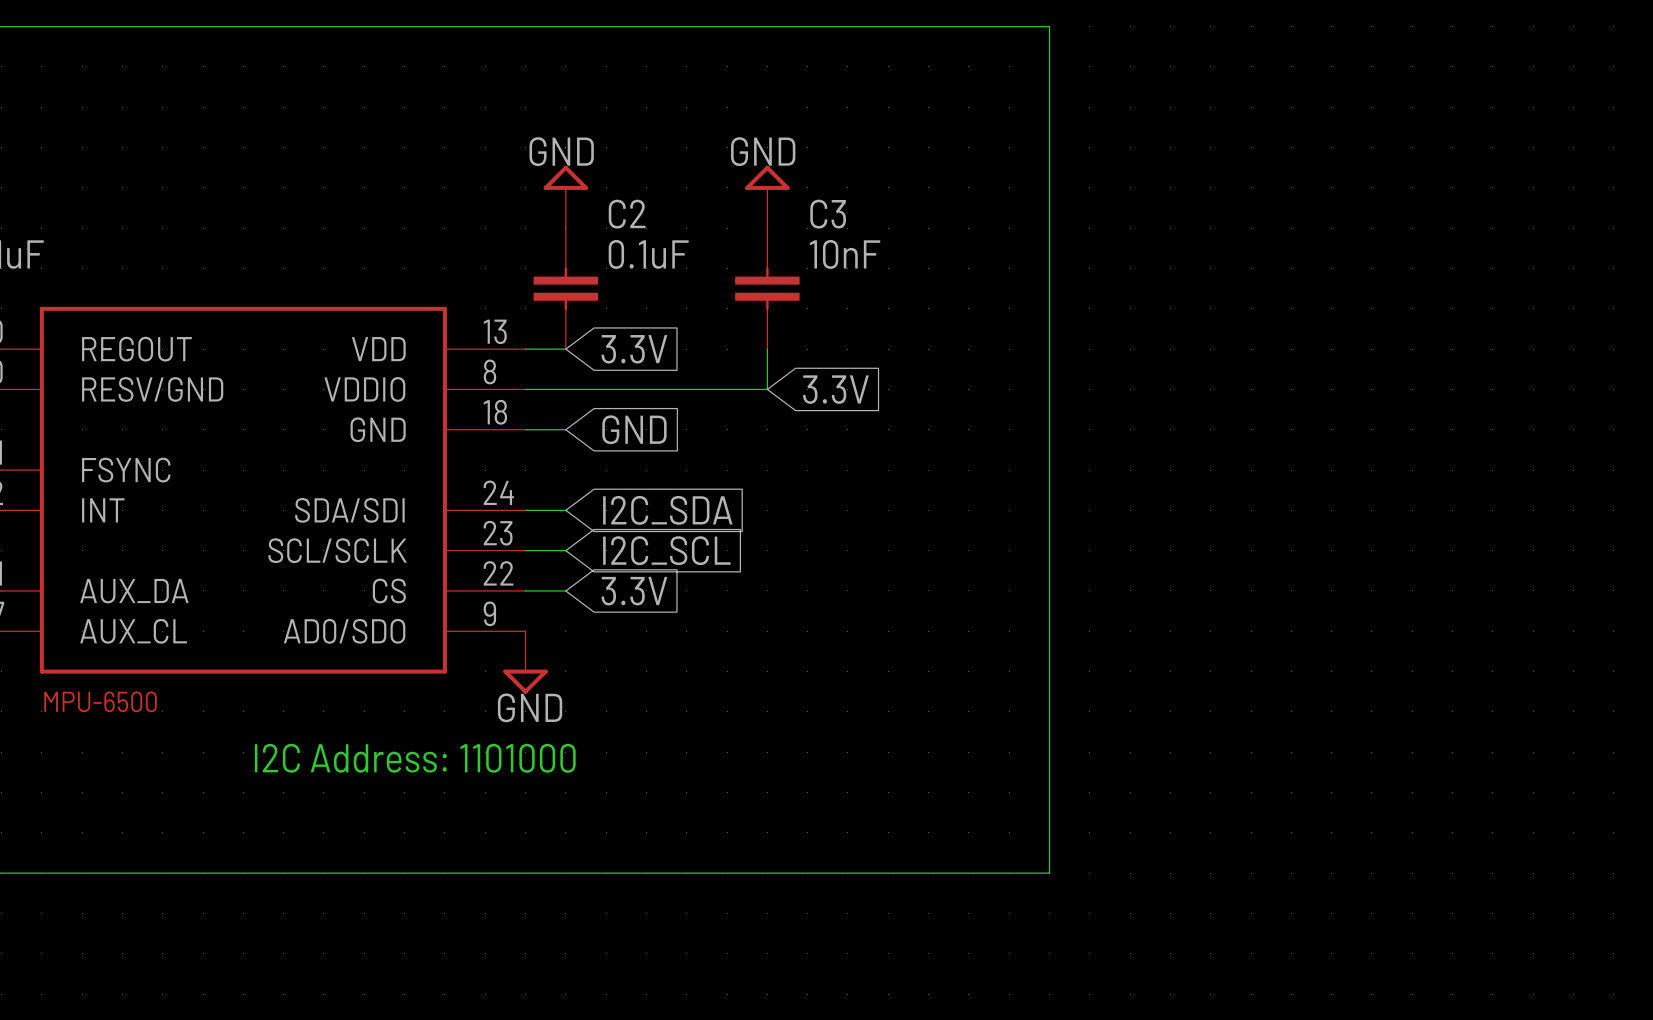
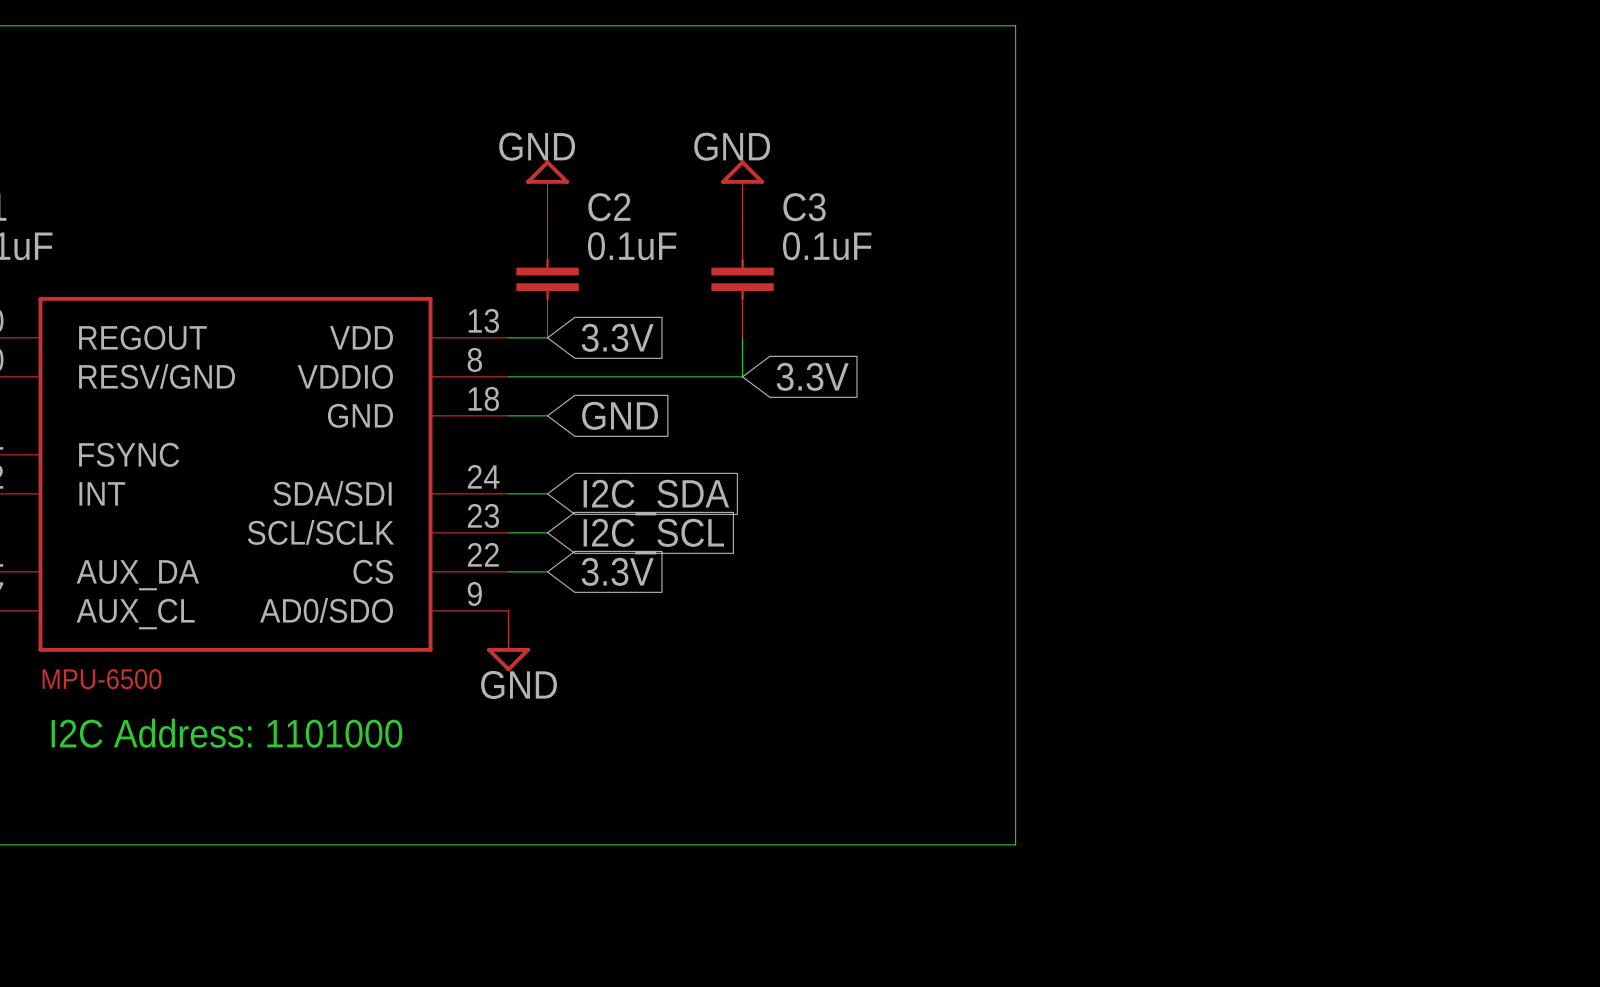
C3 value: 10nF (845, 254) -> 0.1uF (827, 246)
text position: I2C Address: 1101000 (415, 758) -> I2C Address: 1101000 (226, 733)

